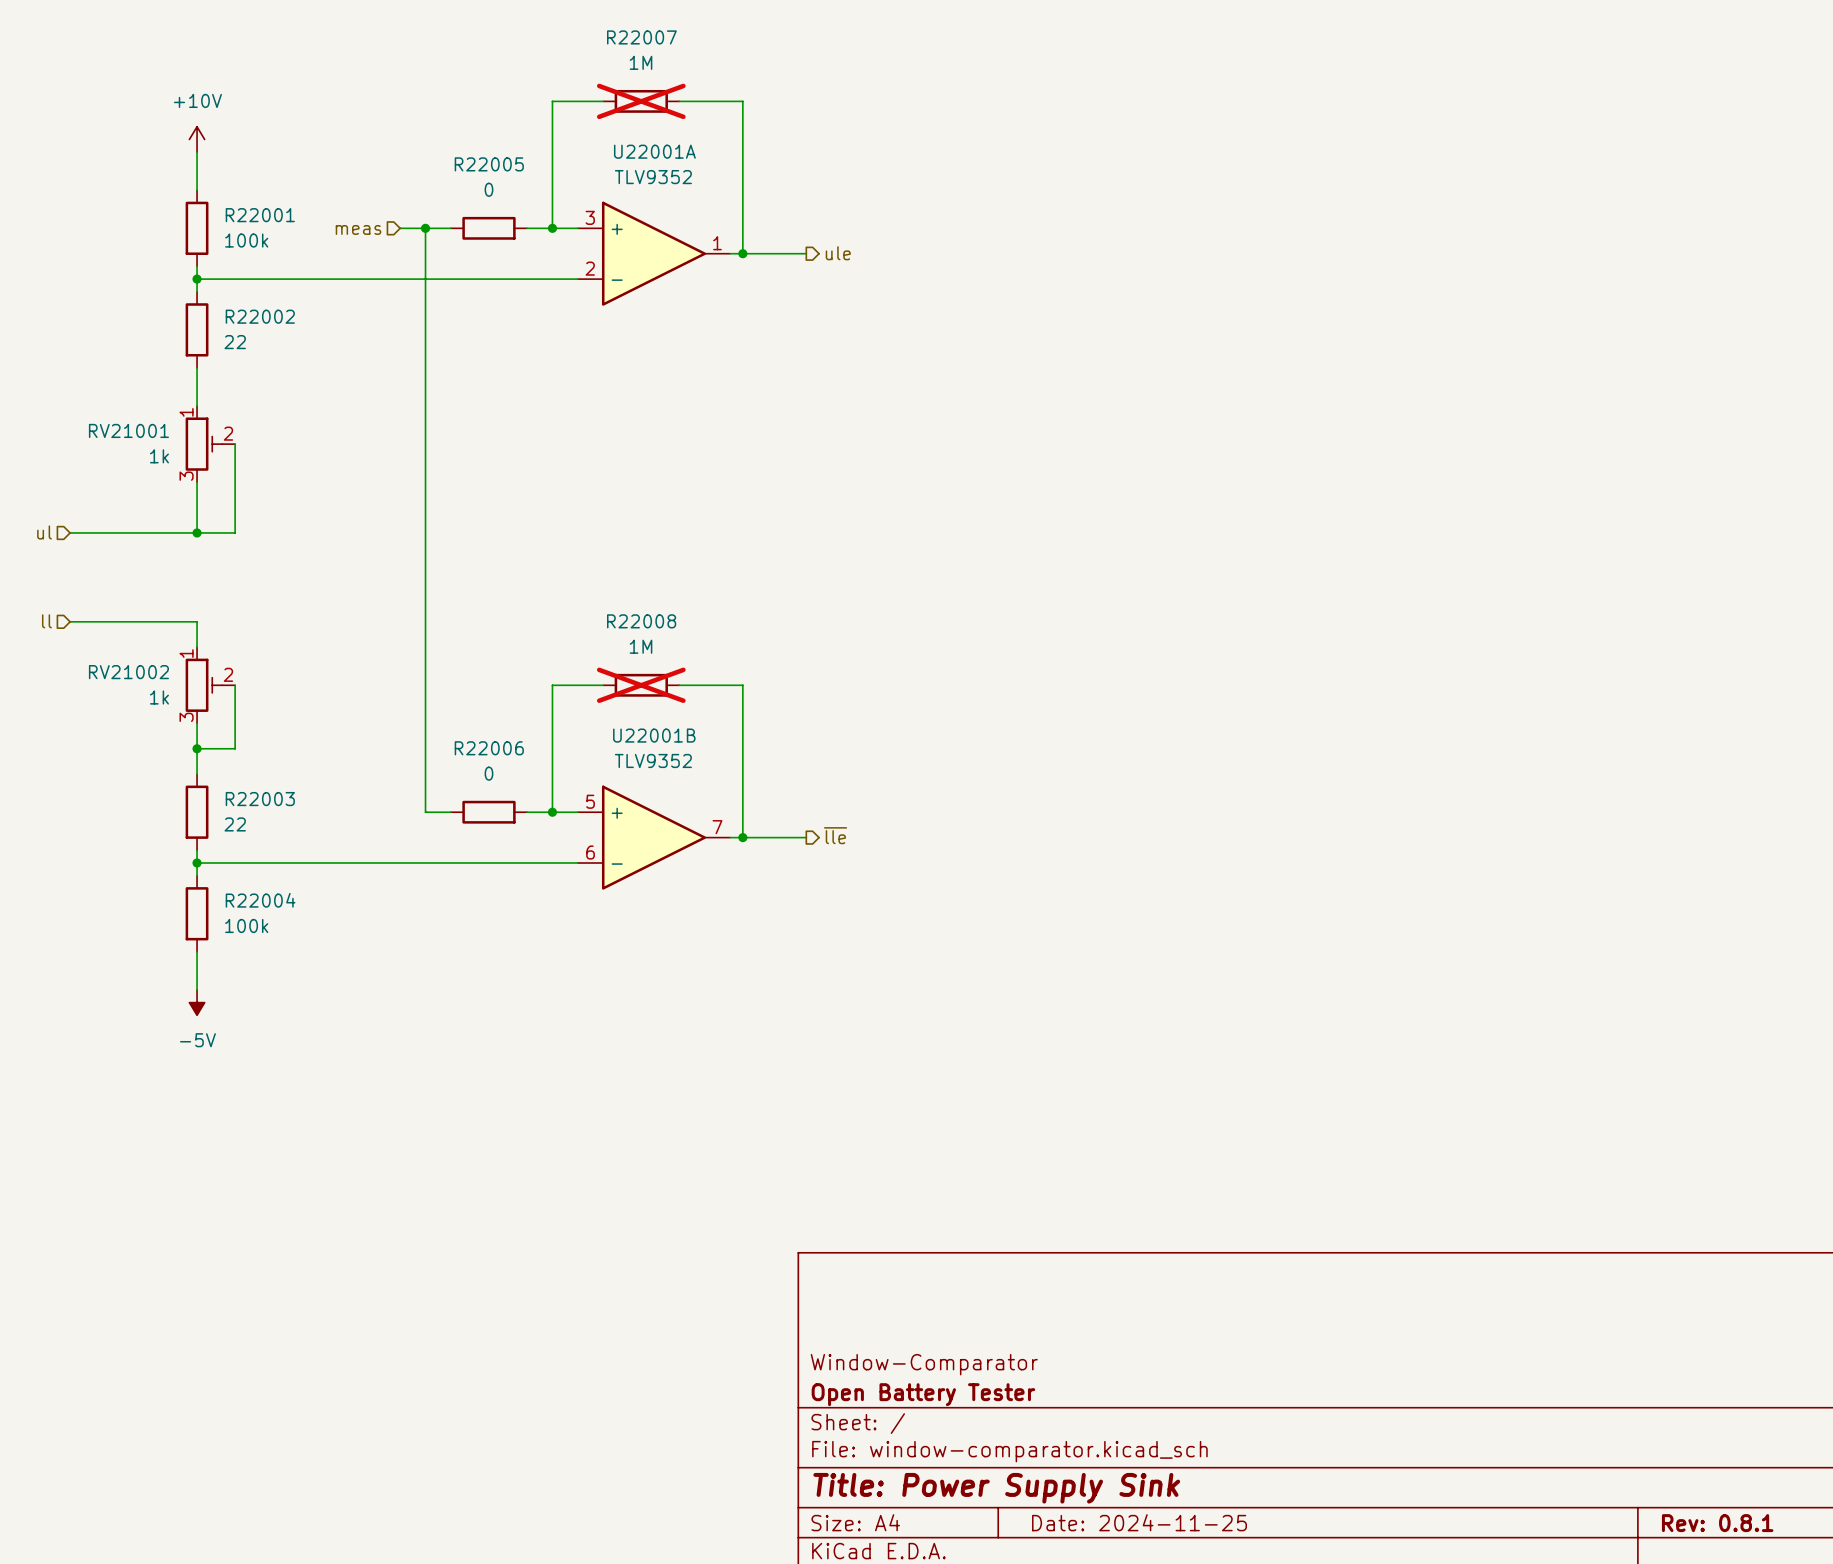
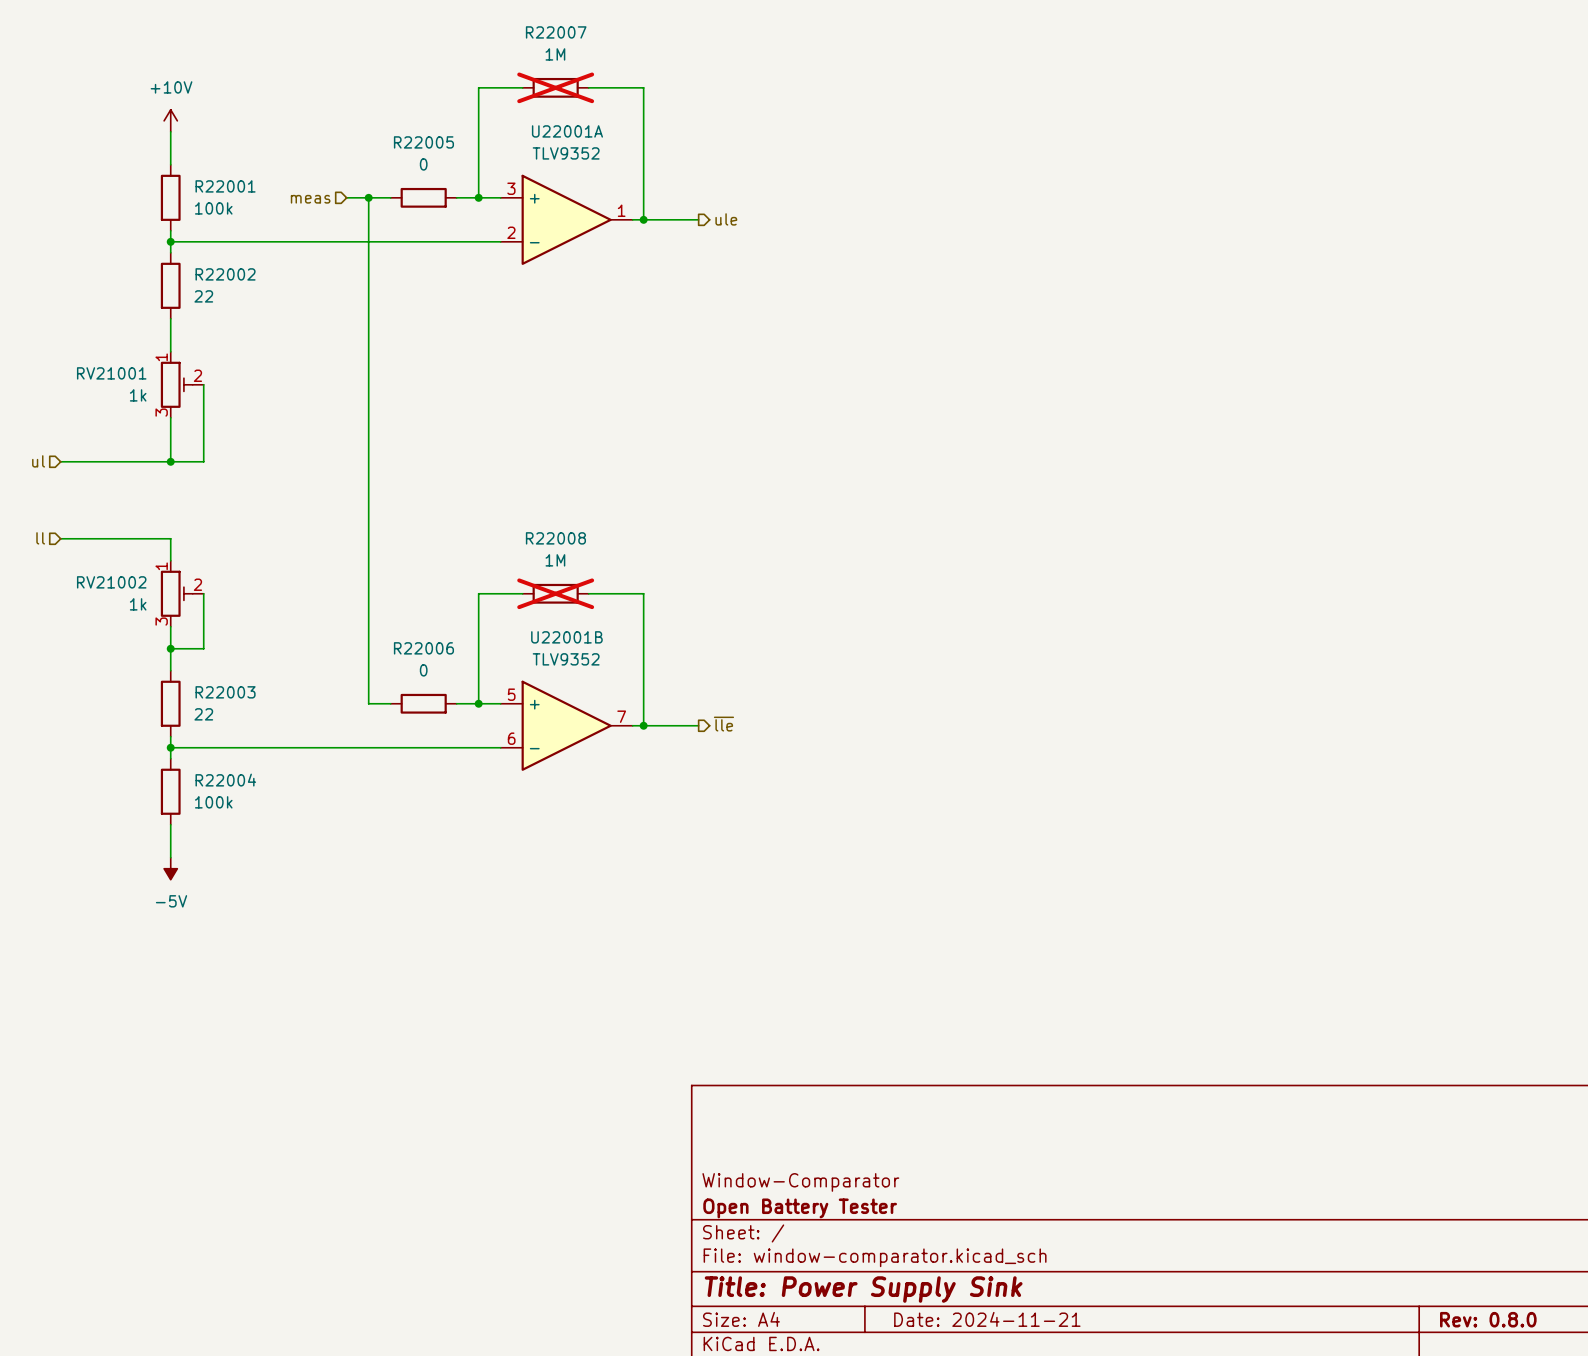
title block: Date: 2024-11-25 (1139, 1522) -> Date: 2024-11-21 (987, 1319)
title block: Rev: 0.8.1 (1717, 1523) -> Rev: 0.8.0 (1488, 1319)

